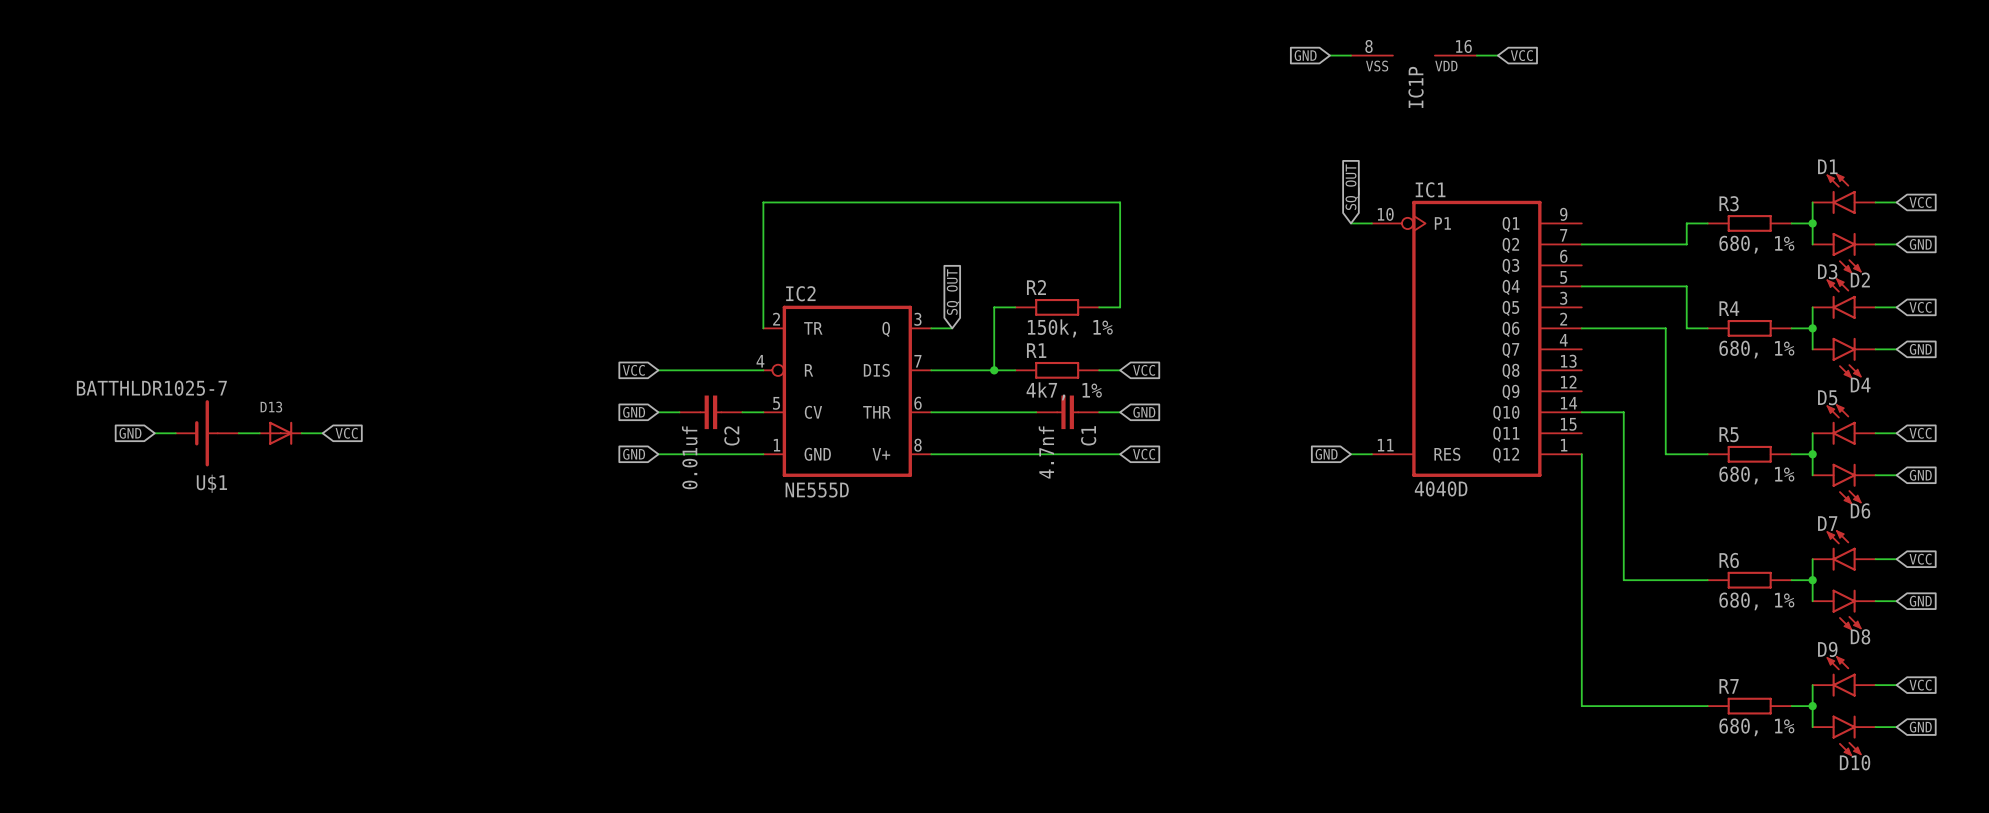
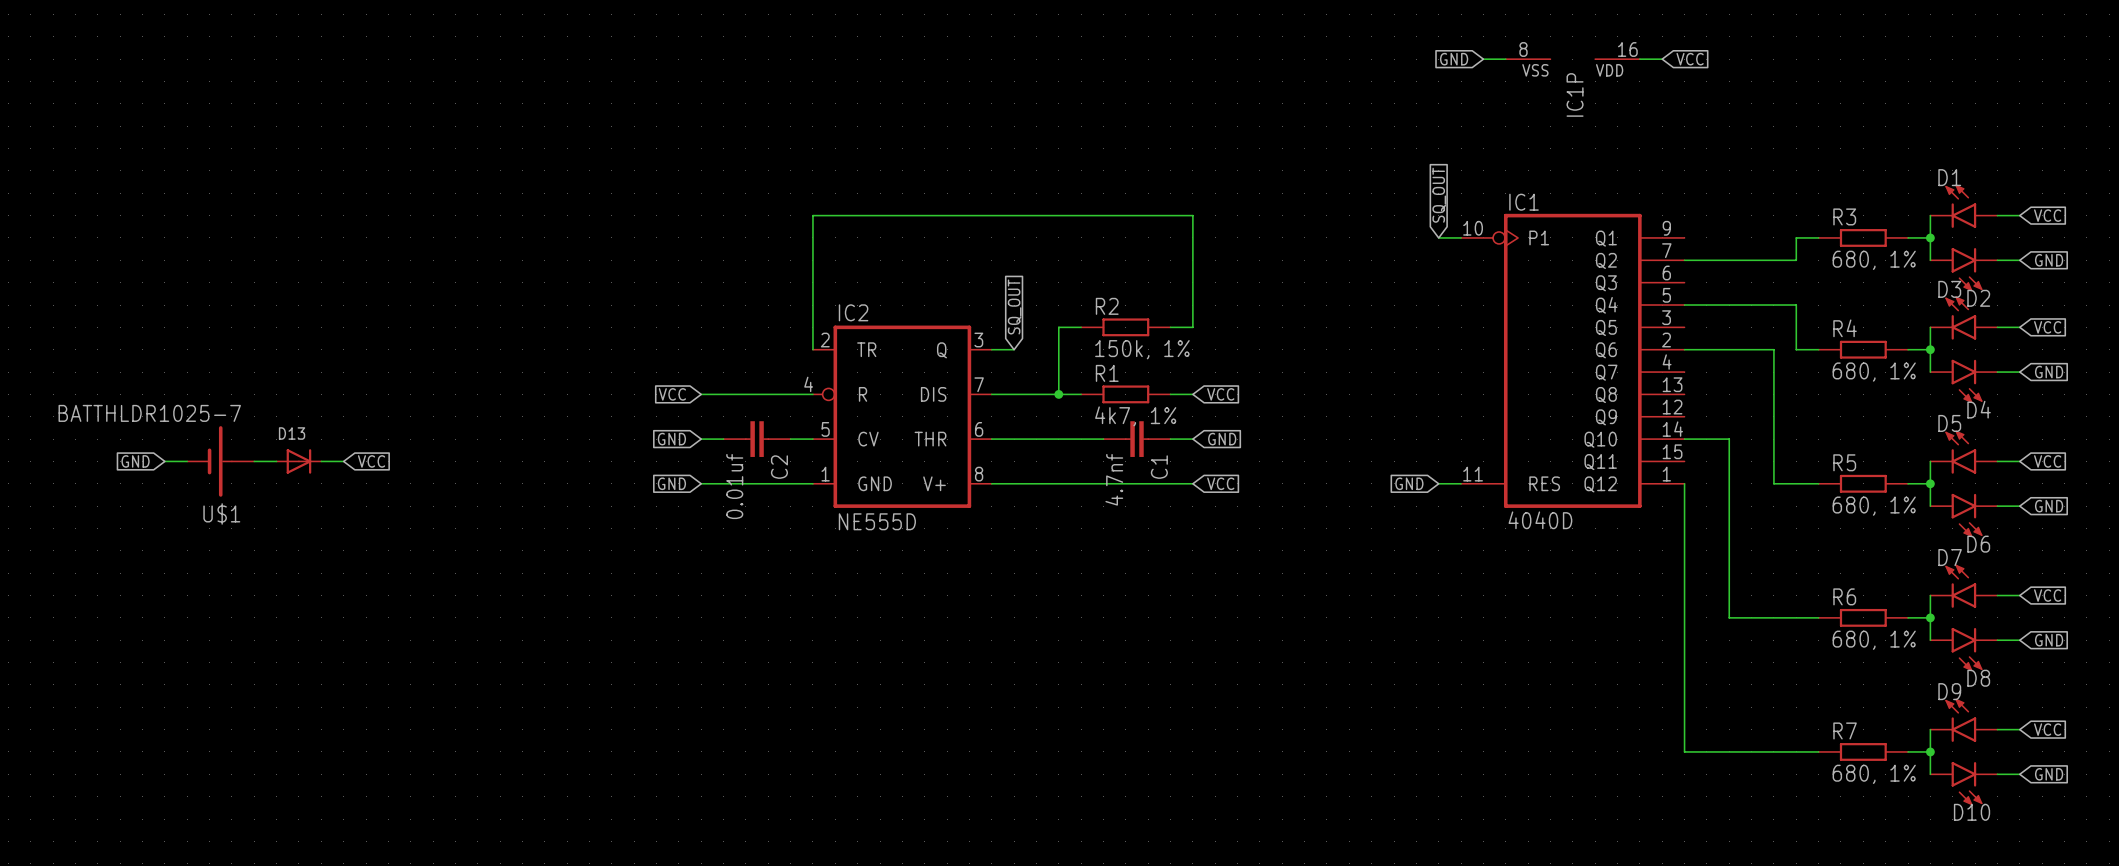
global label position: GND (1305, 55) -> GND (1454, 59)
wire: (1329, 55) (1350, 55) -> (1483, 59) (1505, 59)
IC1P position: (1413, 55) -> (1572, 59)
wire: (1476, 55) (1497, 55) -> (1639, 59) (1662, 59)
global label position: VCC (1521, 55) -> VCC (1690, 59)

